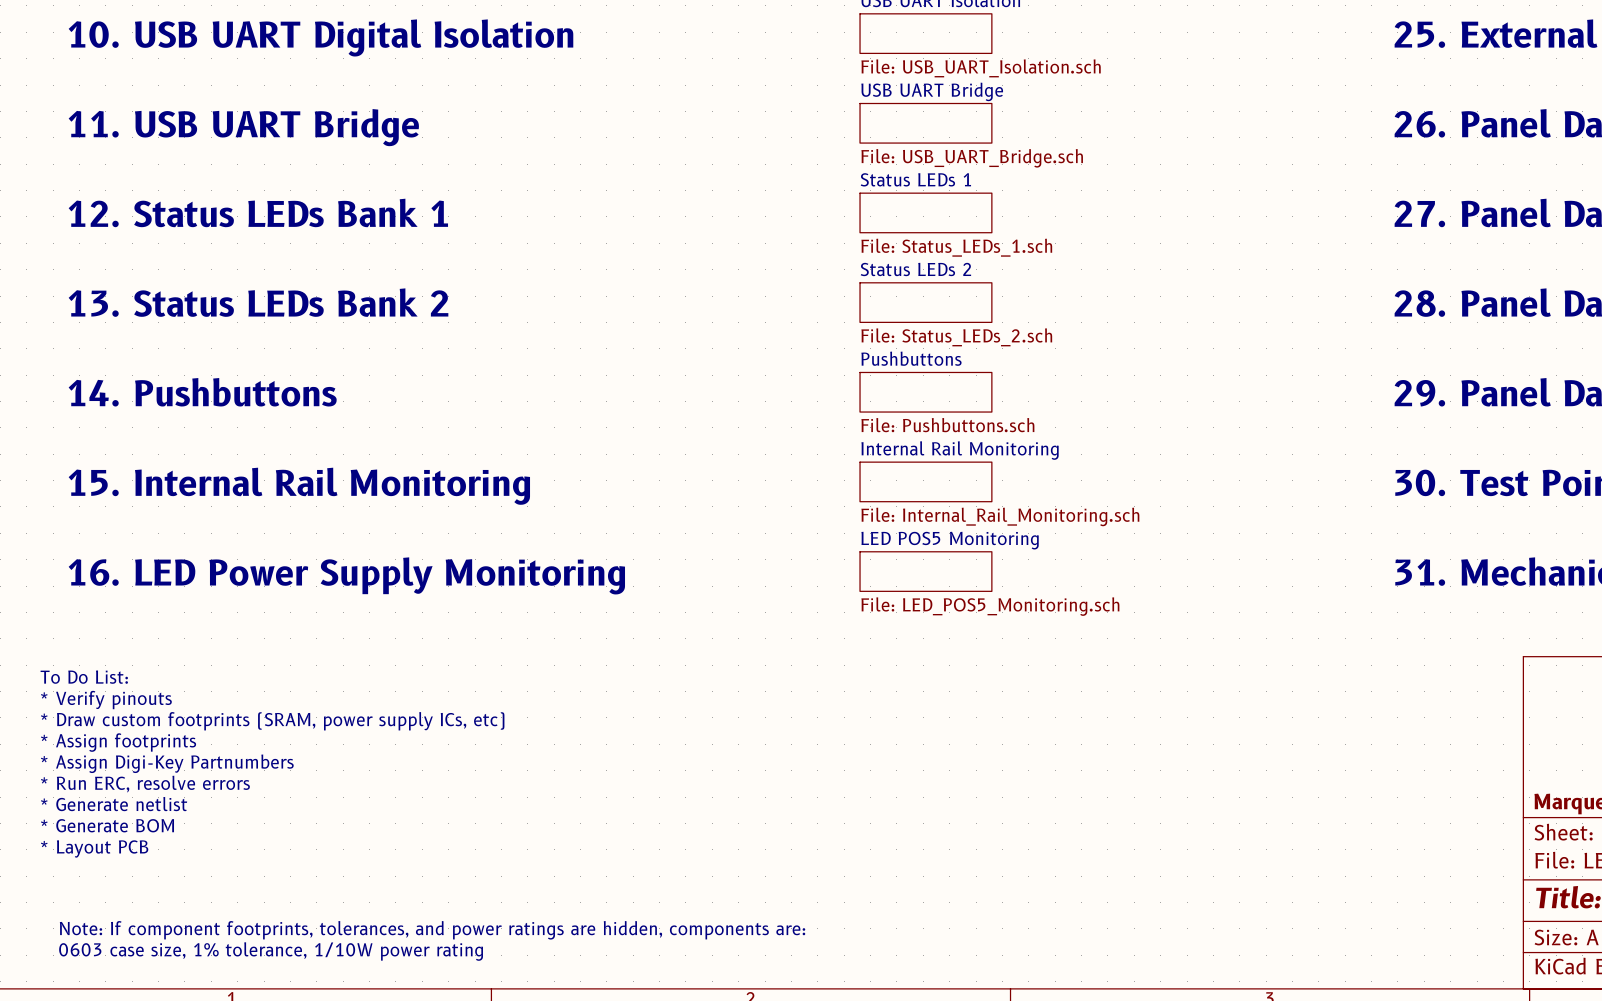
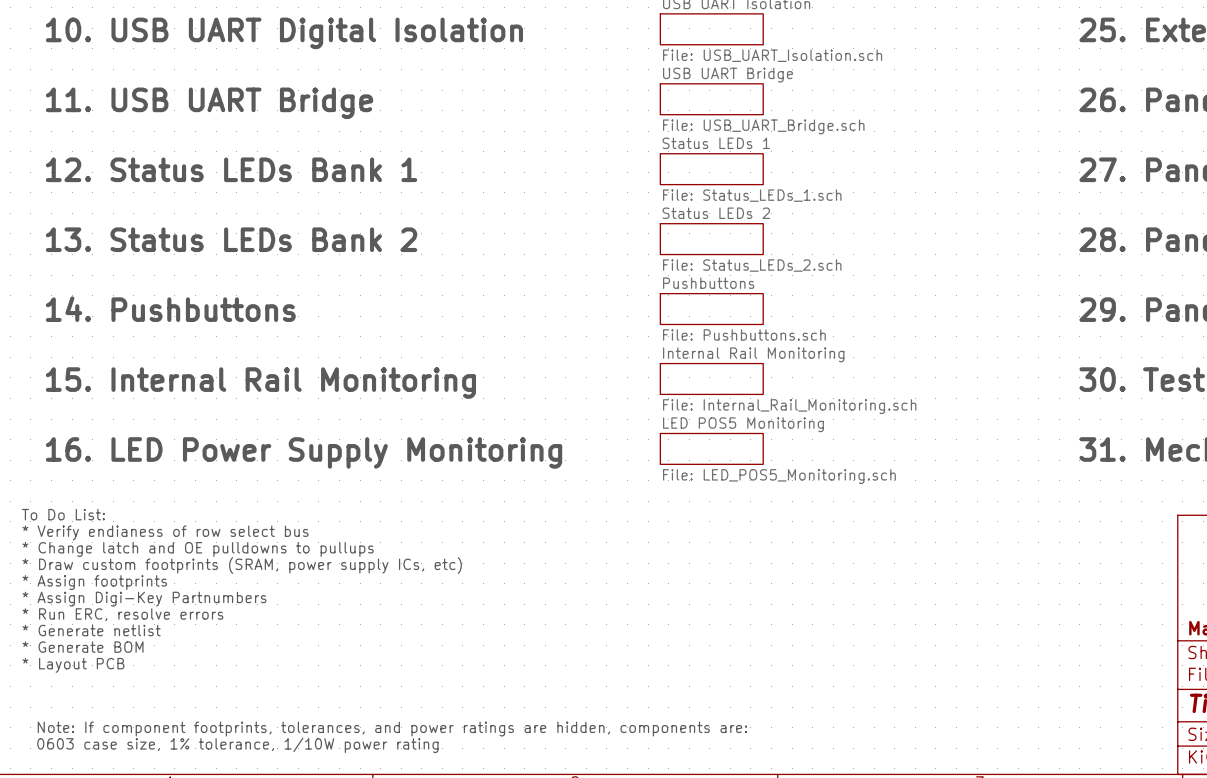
text: none -> To Do List: (63, 514)
text: To Do List: (84, 677) -> * Verify endianess of row select bus (165, 532)
text: * Verify pinouts (106, 700) -> * Change latch and OE pulldowns to pullups (198, 549)

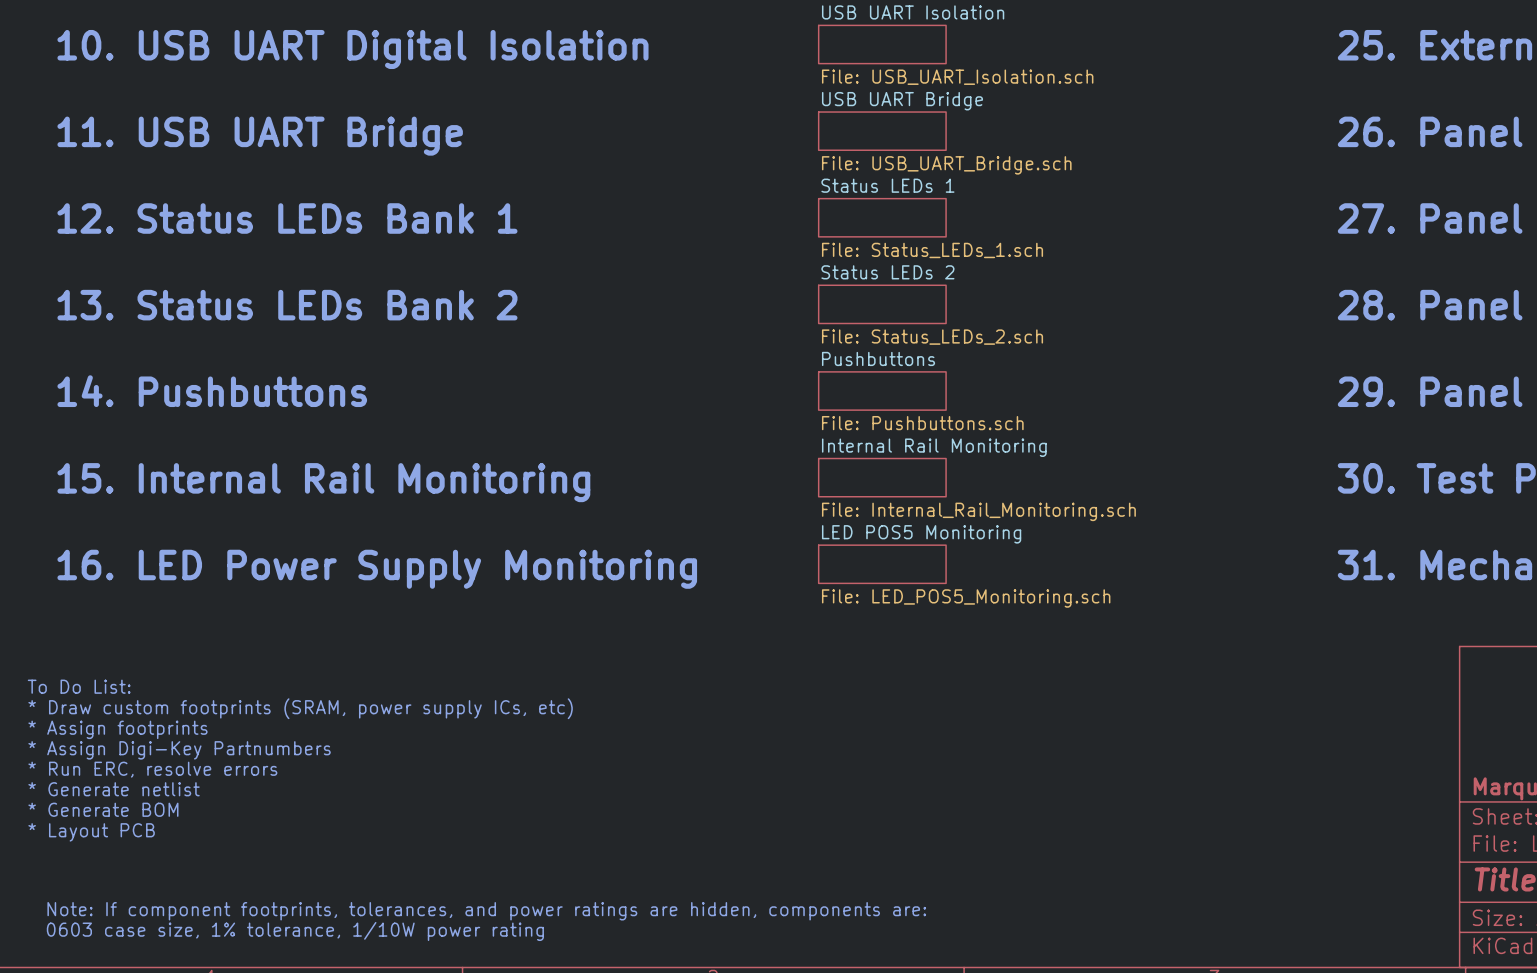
text: To Do List: (63, 514) -> none
text: * Verify endianess of row select bus (165, 532) -> none
text: * Change latch and OE pulldowns to pullups (198, 549) -> To Do List: (79, 686)

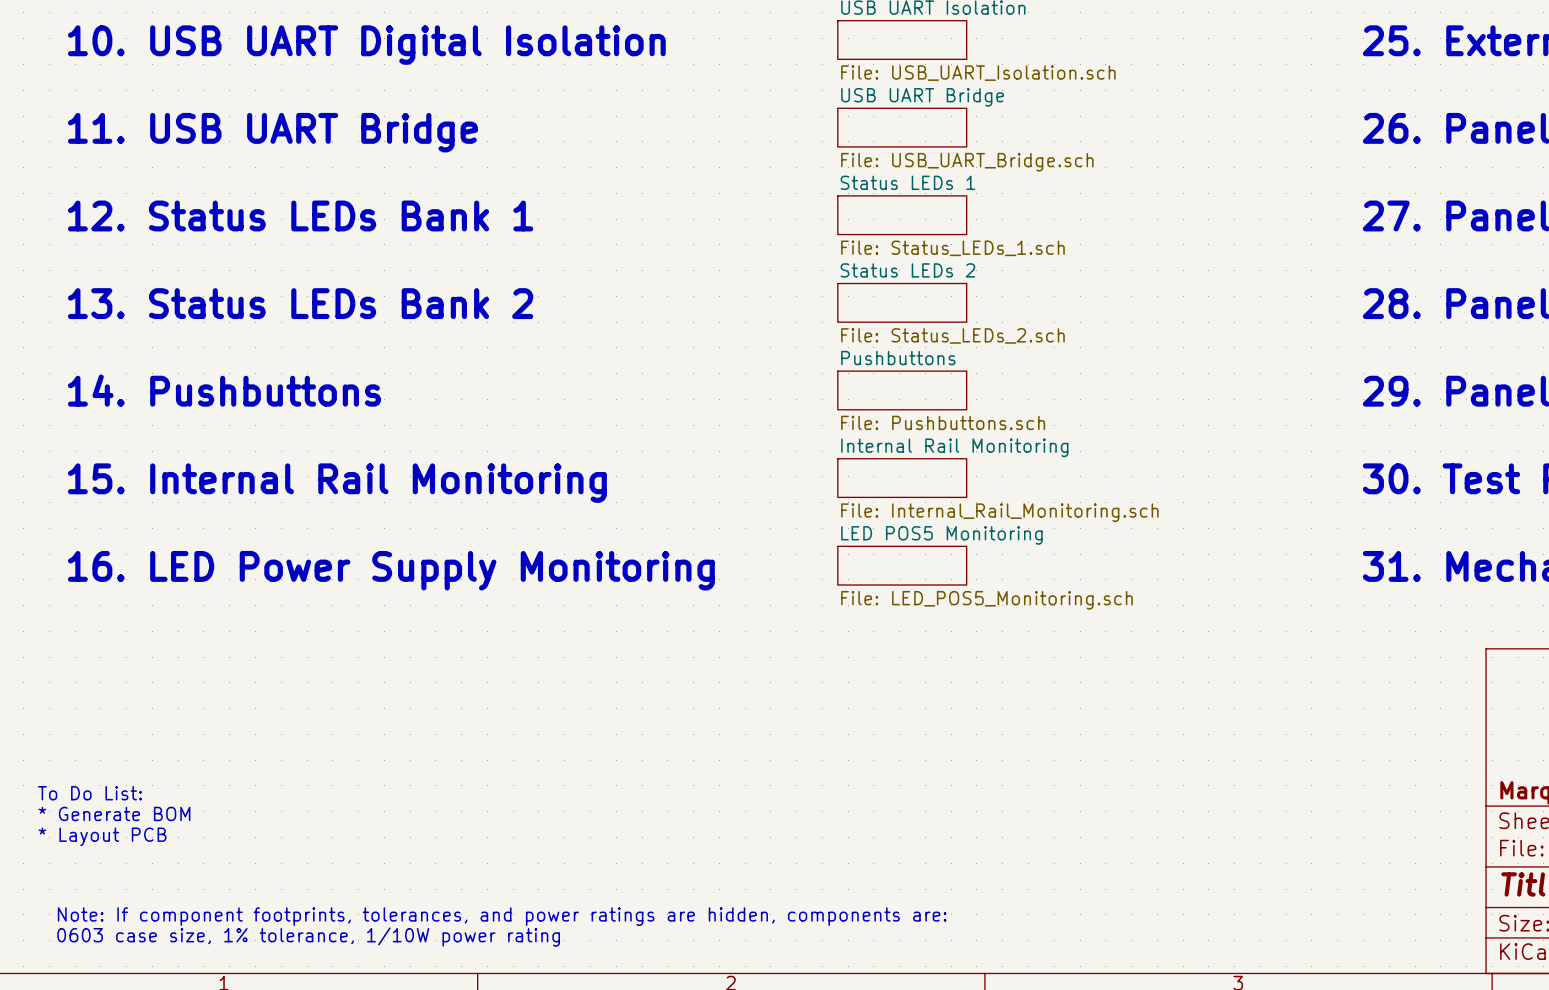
text: To Do List: (79, 686) -> none
text: * Draw custom footprints (SRAM, power supply ICs, etc) (300, 708) -> none
text: * Assign footprints (117, 729) -> none
text: * Assign Digi-Key Partnumbers (179, 750) -> none
text: * Run ERC, resolve errors (152, 769) -> none
text: * Generate netlist (114, 789) -> To Do List: (89, 793)

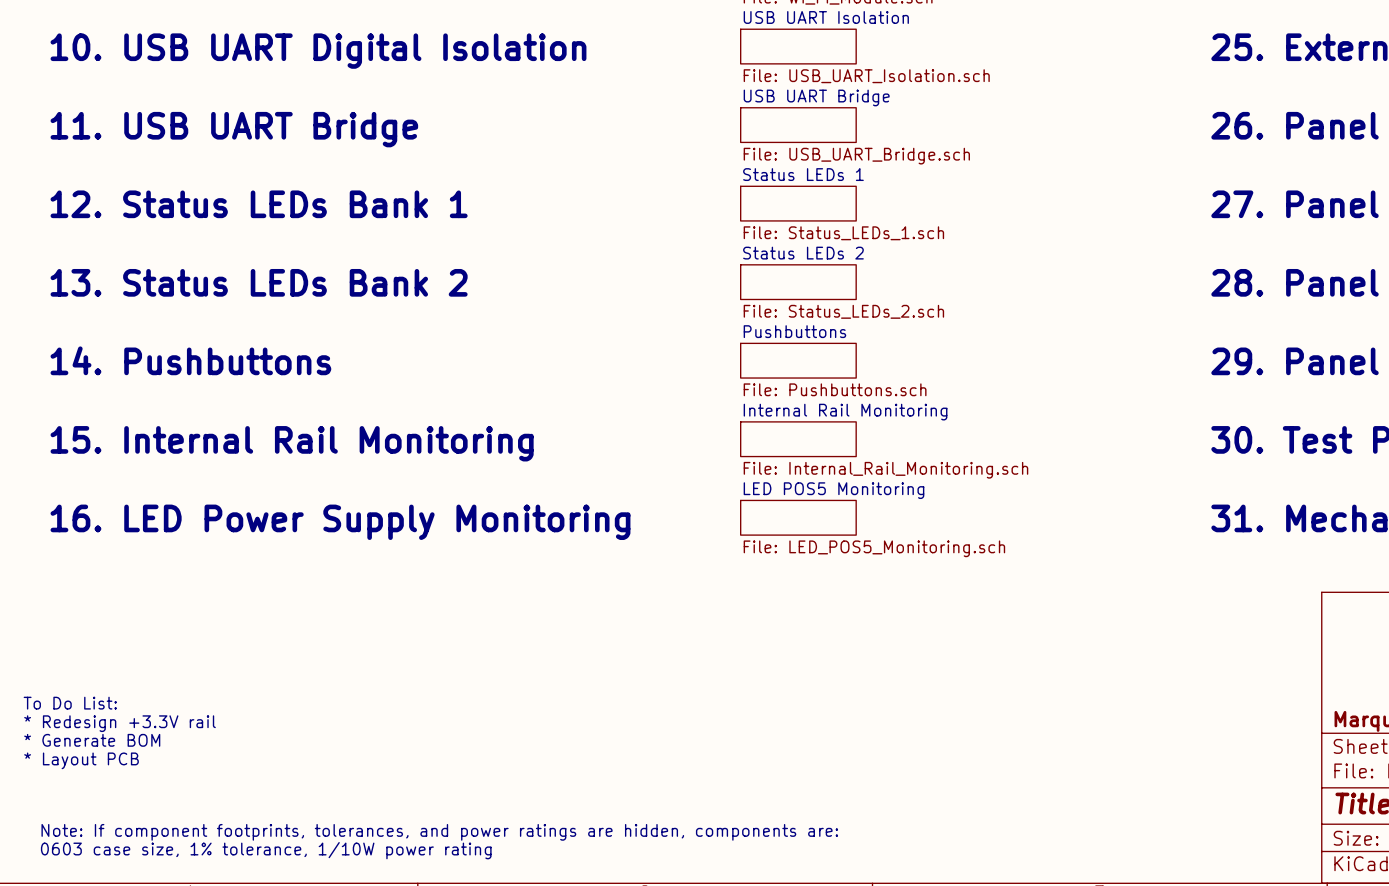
text: none -> To Do List: (70, 703)
text: To Do List: (89, 793) -> * Redesign +3.3V rail (120, 723)

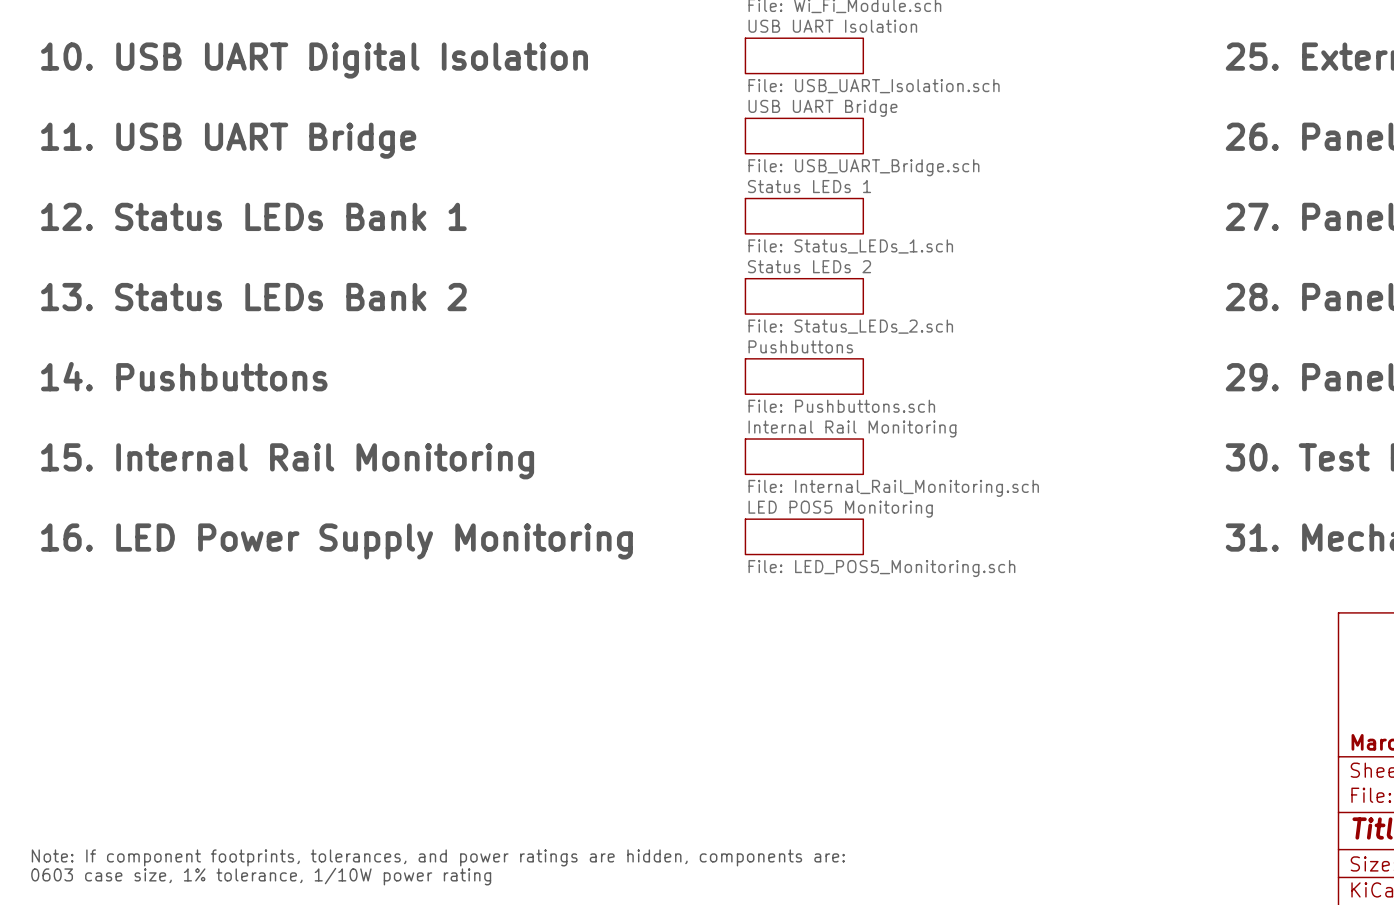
text: To Do List: (70, 703) -> none
text: * Redesign +3.3V rail (120, 723) -> none
text: * Generate BOM (92, 740) -> none
text: * Layout PCB (81, 760) -> none

